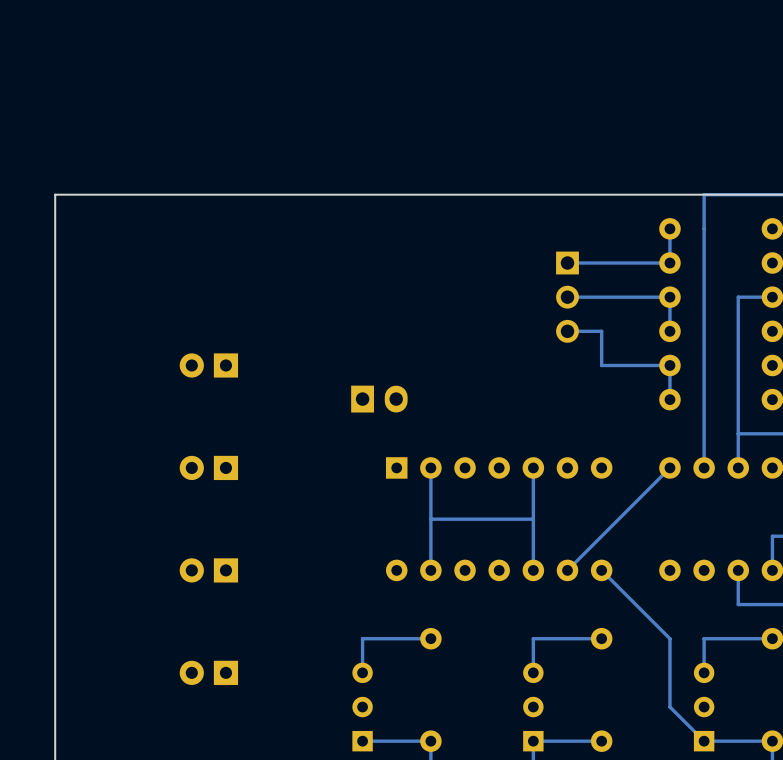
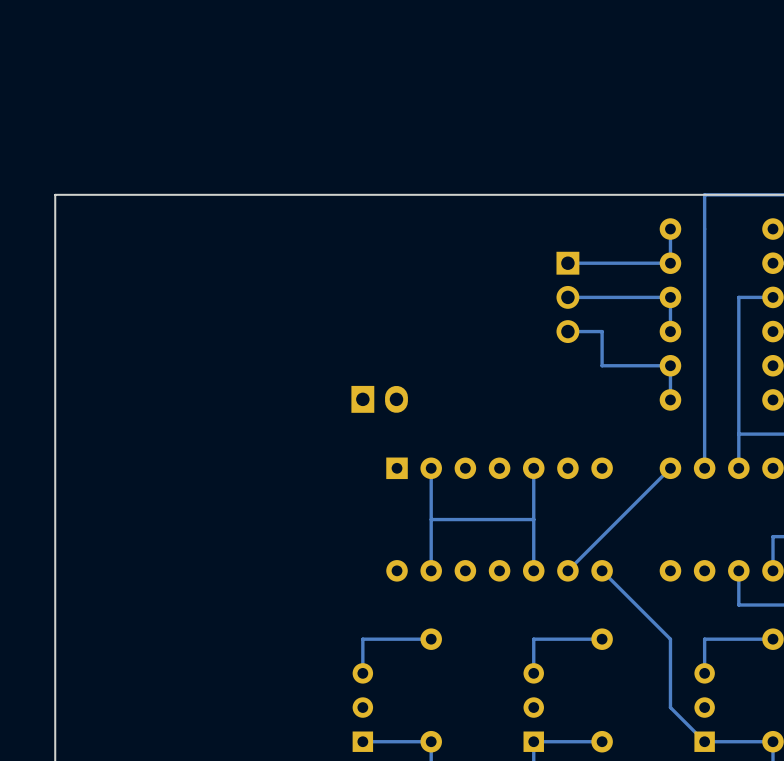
part: (208, 365) -> none
part: (208, 467) -> none
part: (208, 570) -> none
part: (208, 672) -> none

